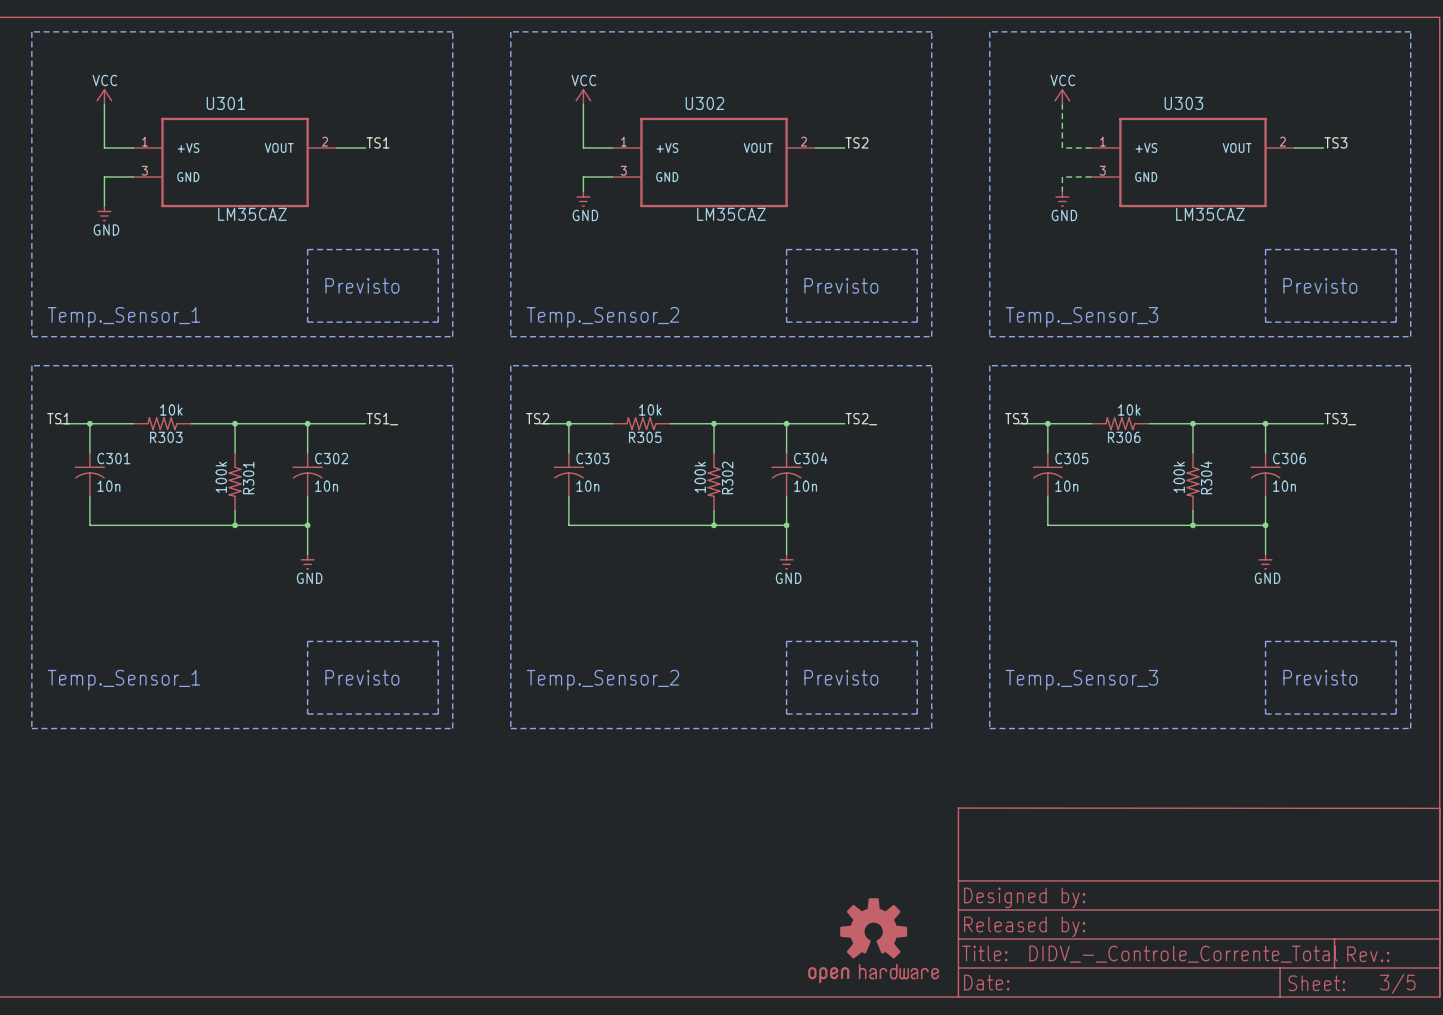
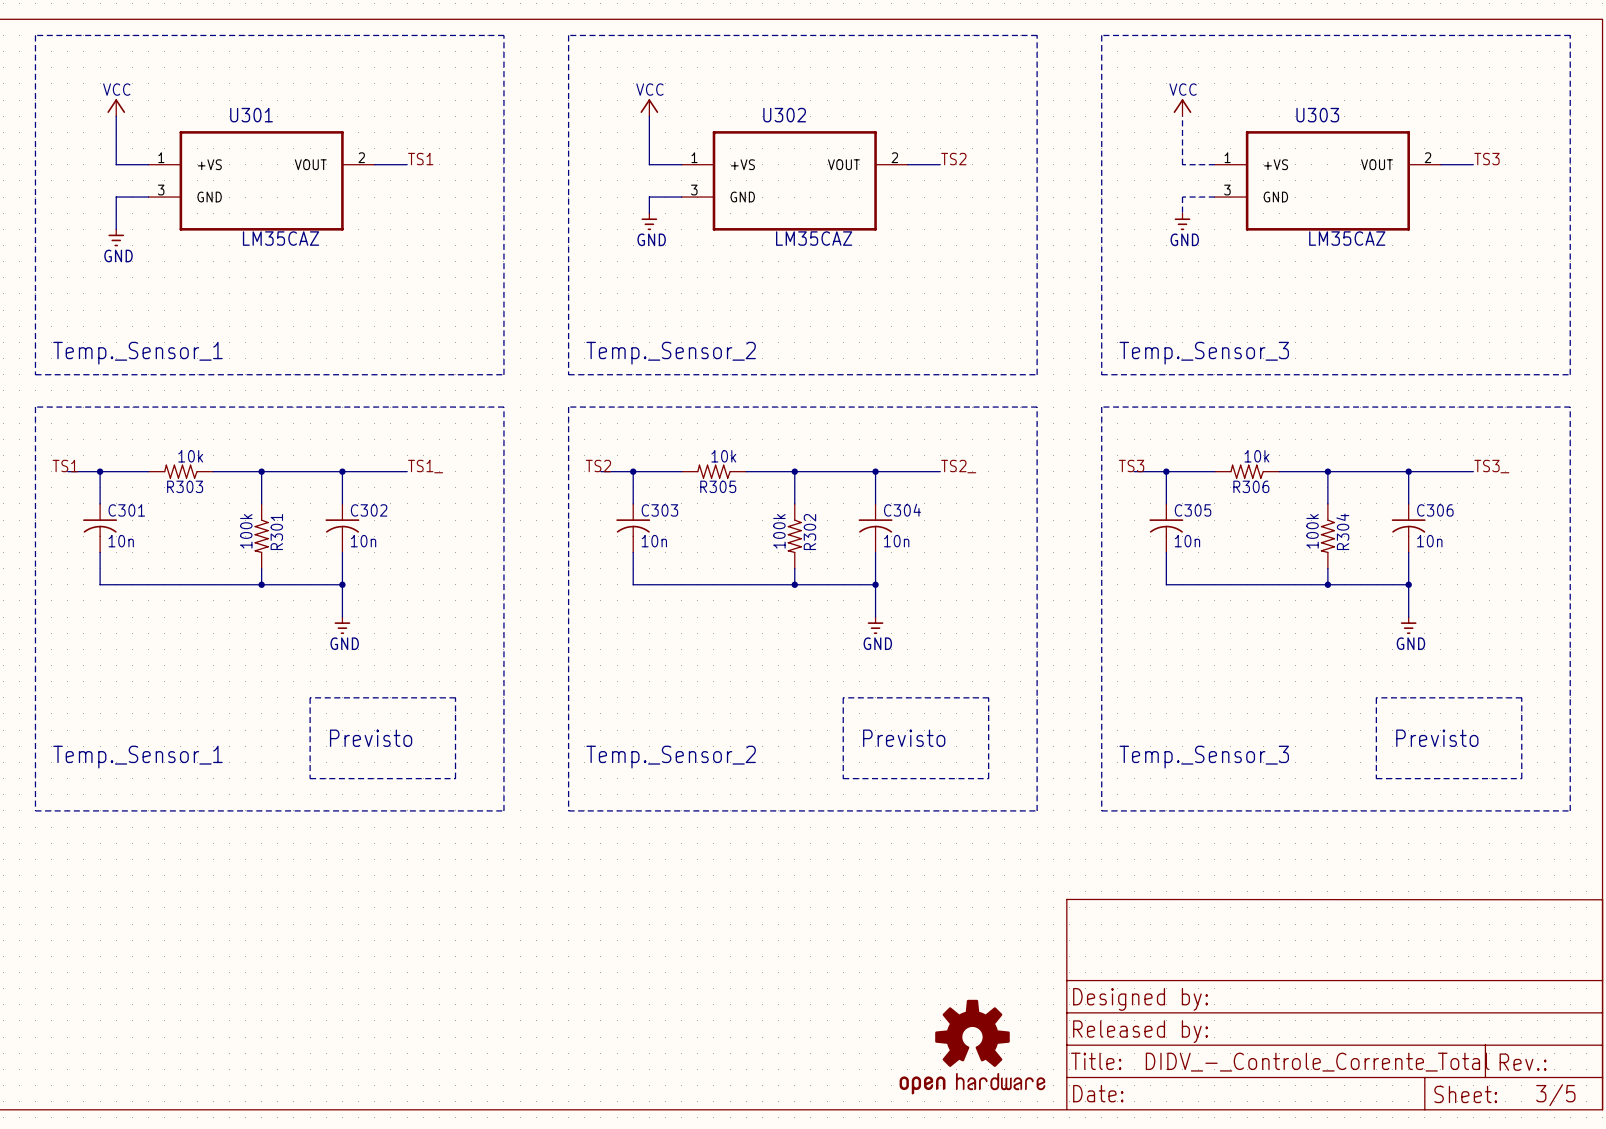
line: (307, 249) (307, 322) (438, 322) (438, 249) (307, 249) -> none
line: (786, 249) (786, 322) (917, 322) (917, 249) (786, 249) -> none
line: (1265, 249) (1265, 322) (1396, 322) (1396, 249) (1265, 249) -> none
text: Previsto (362, 285) -> none
text: Previsto (841, 285) -> none
text: Previsto (1320, 285) -> none
line: (307, 641) (307, 714) (438, 714) (438, 641) (307, 641) -> (310, 697) (310, 778) (455, 778) (455, 697) (310, 697)
line: (786, 641) (917, 641) (917, 714) (786, 714) (786, 641) -> (843, 697) (988, 697) (988, 778) (843, 778) (843, 697)
line: (1265, 641) (1396, 641) (1396, 714) (1265, 714) (1265, 641) -> (1376, 697) (1521, 697) (1521, 778) (1376, 778) (1376, 697)
text position: Previsto (362, 677) -> Previsto (371, 738)
text position: Previsto (841, 677) -> Previsto (904, 738)
text position: Previsto (1320, 677) -> Previsto (1437, 738)

